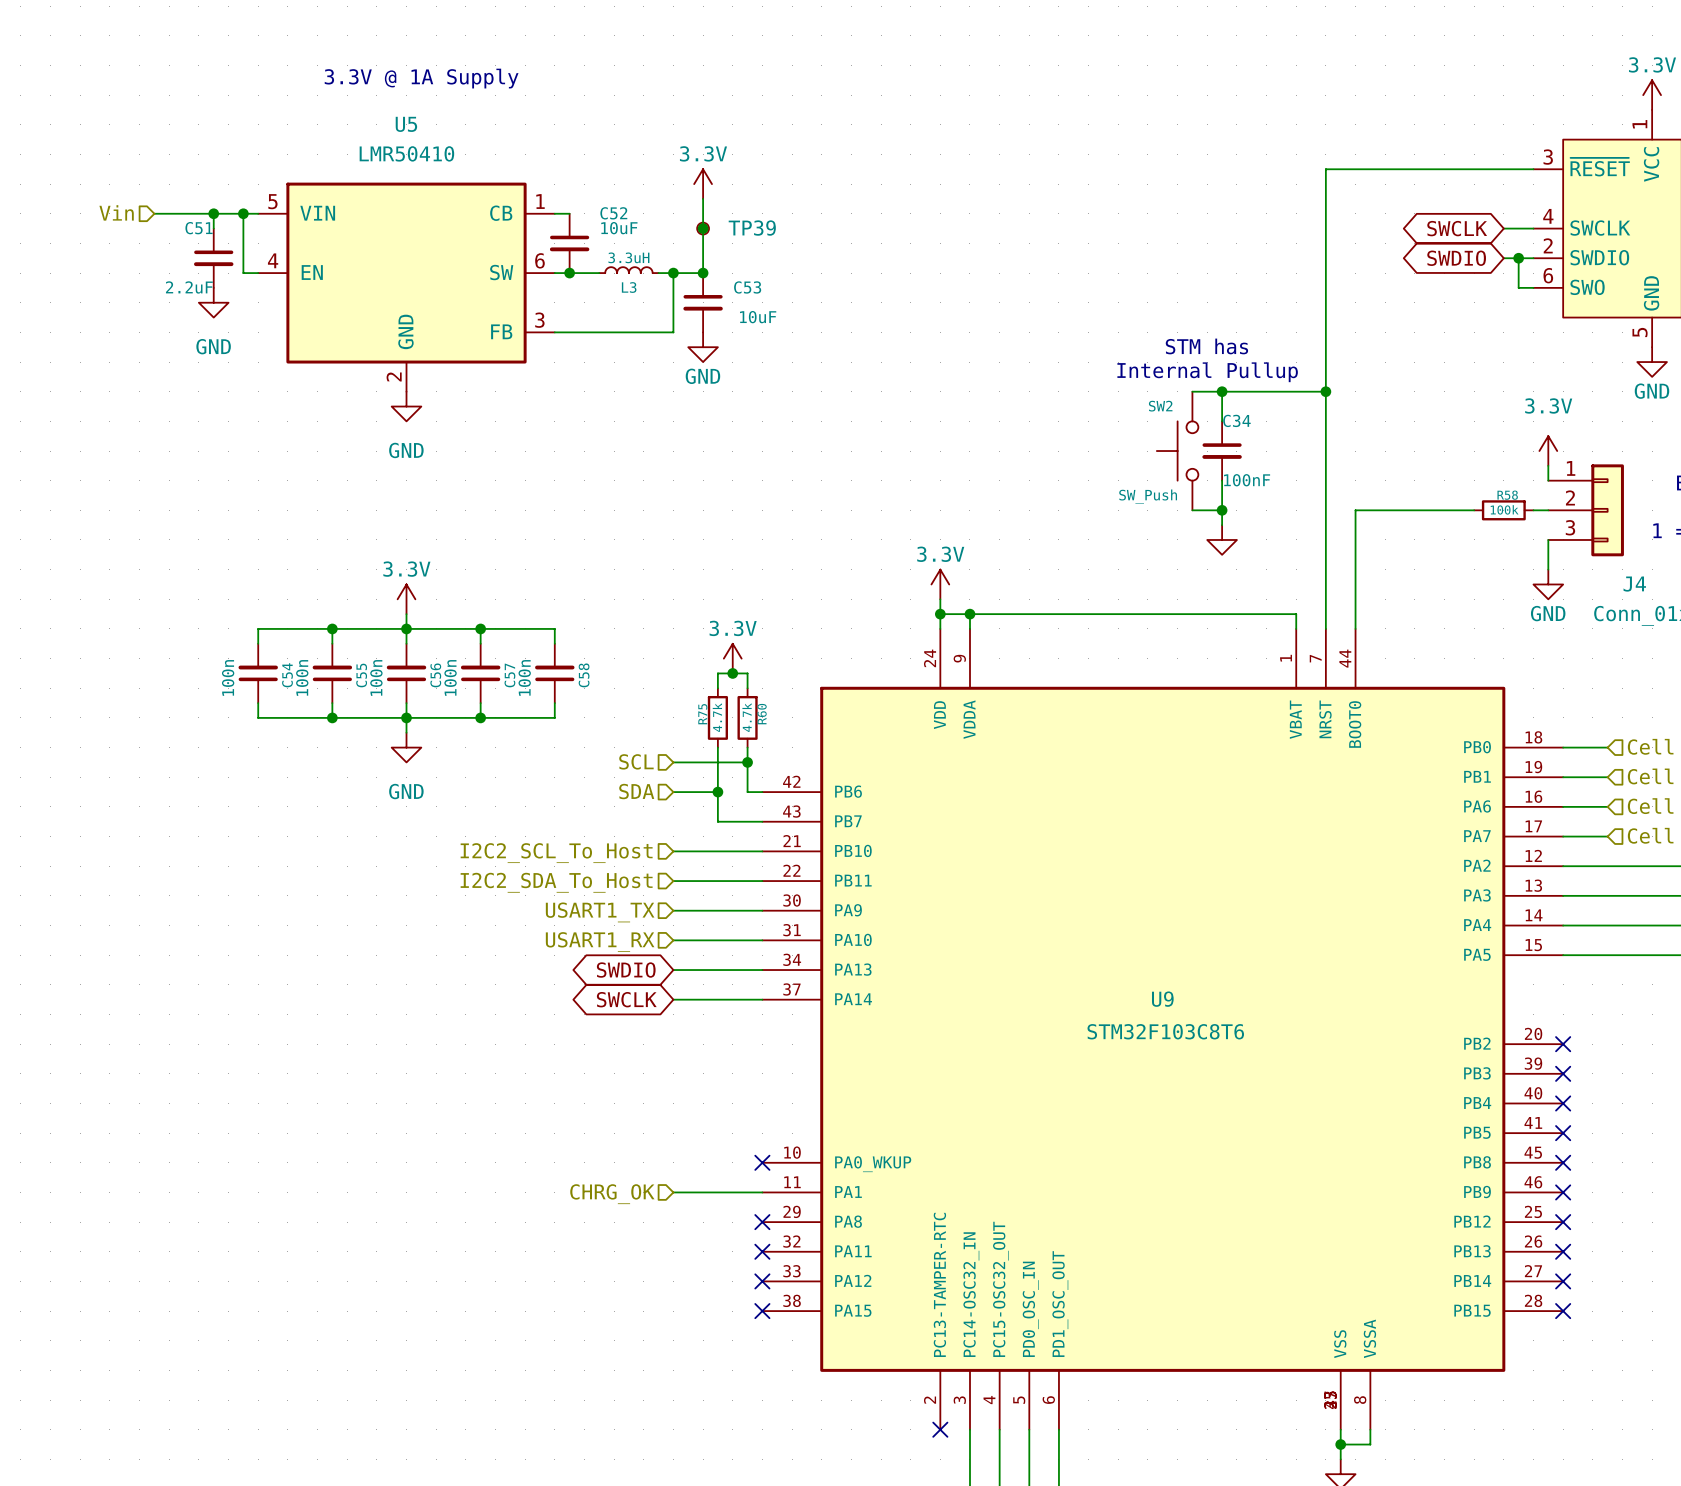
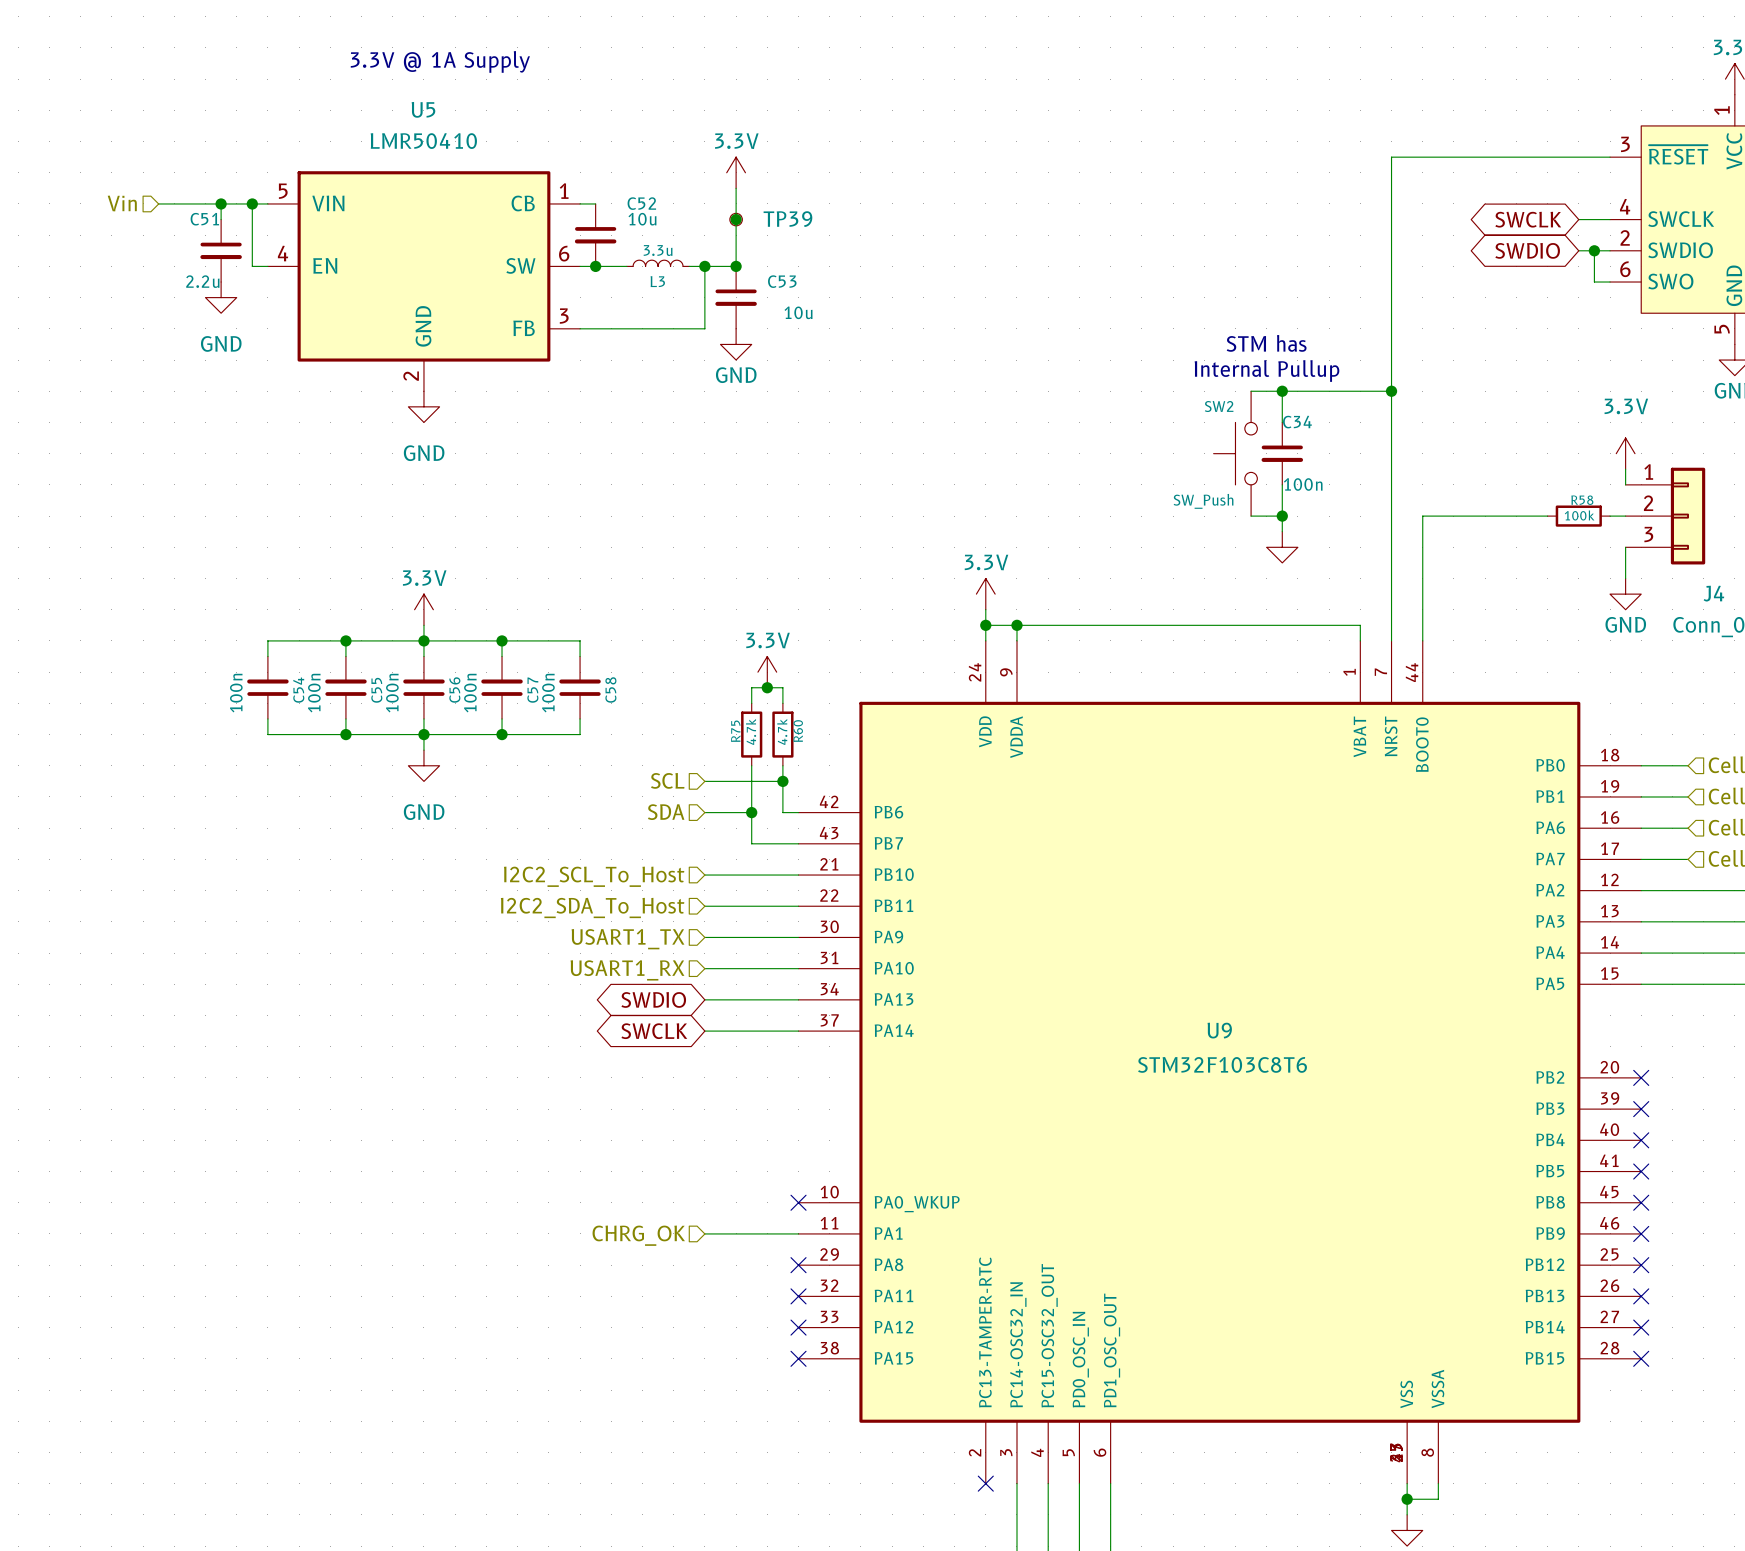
C52 value: 10uF (619, 228) -> 10u (642, 219)
L3 value: 3.3uH (628, 257) -> 3.3u (658, 250)
C51 value: 2.2uF (189, 287) -> 2.2u (202, 281)
C53 value: 10uF (758, 317) -> 10u (798, 312)
C34 value: 100nF (1247, 480) -> 100n (1303, 484)

